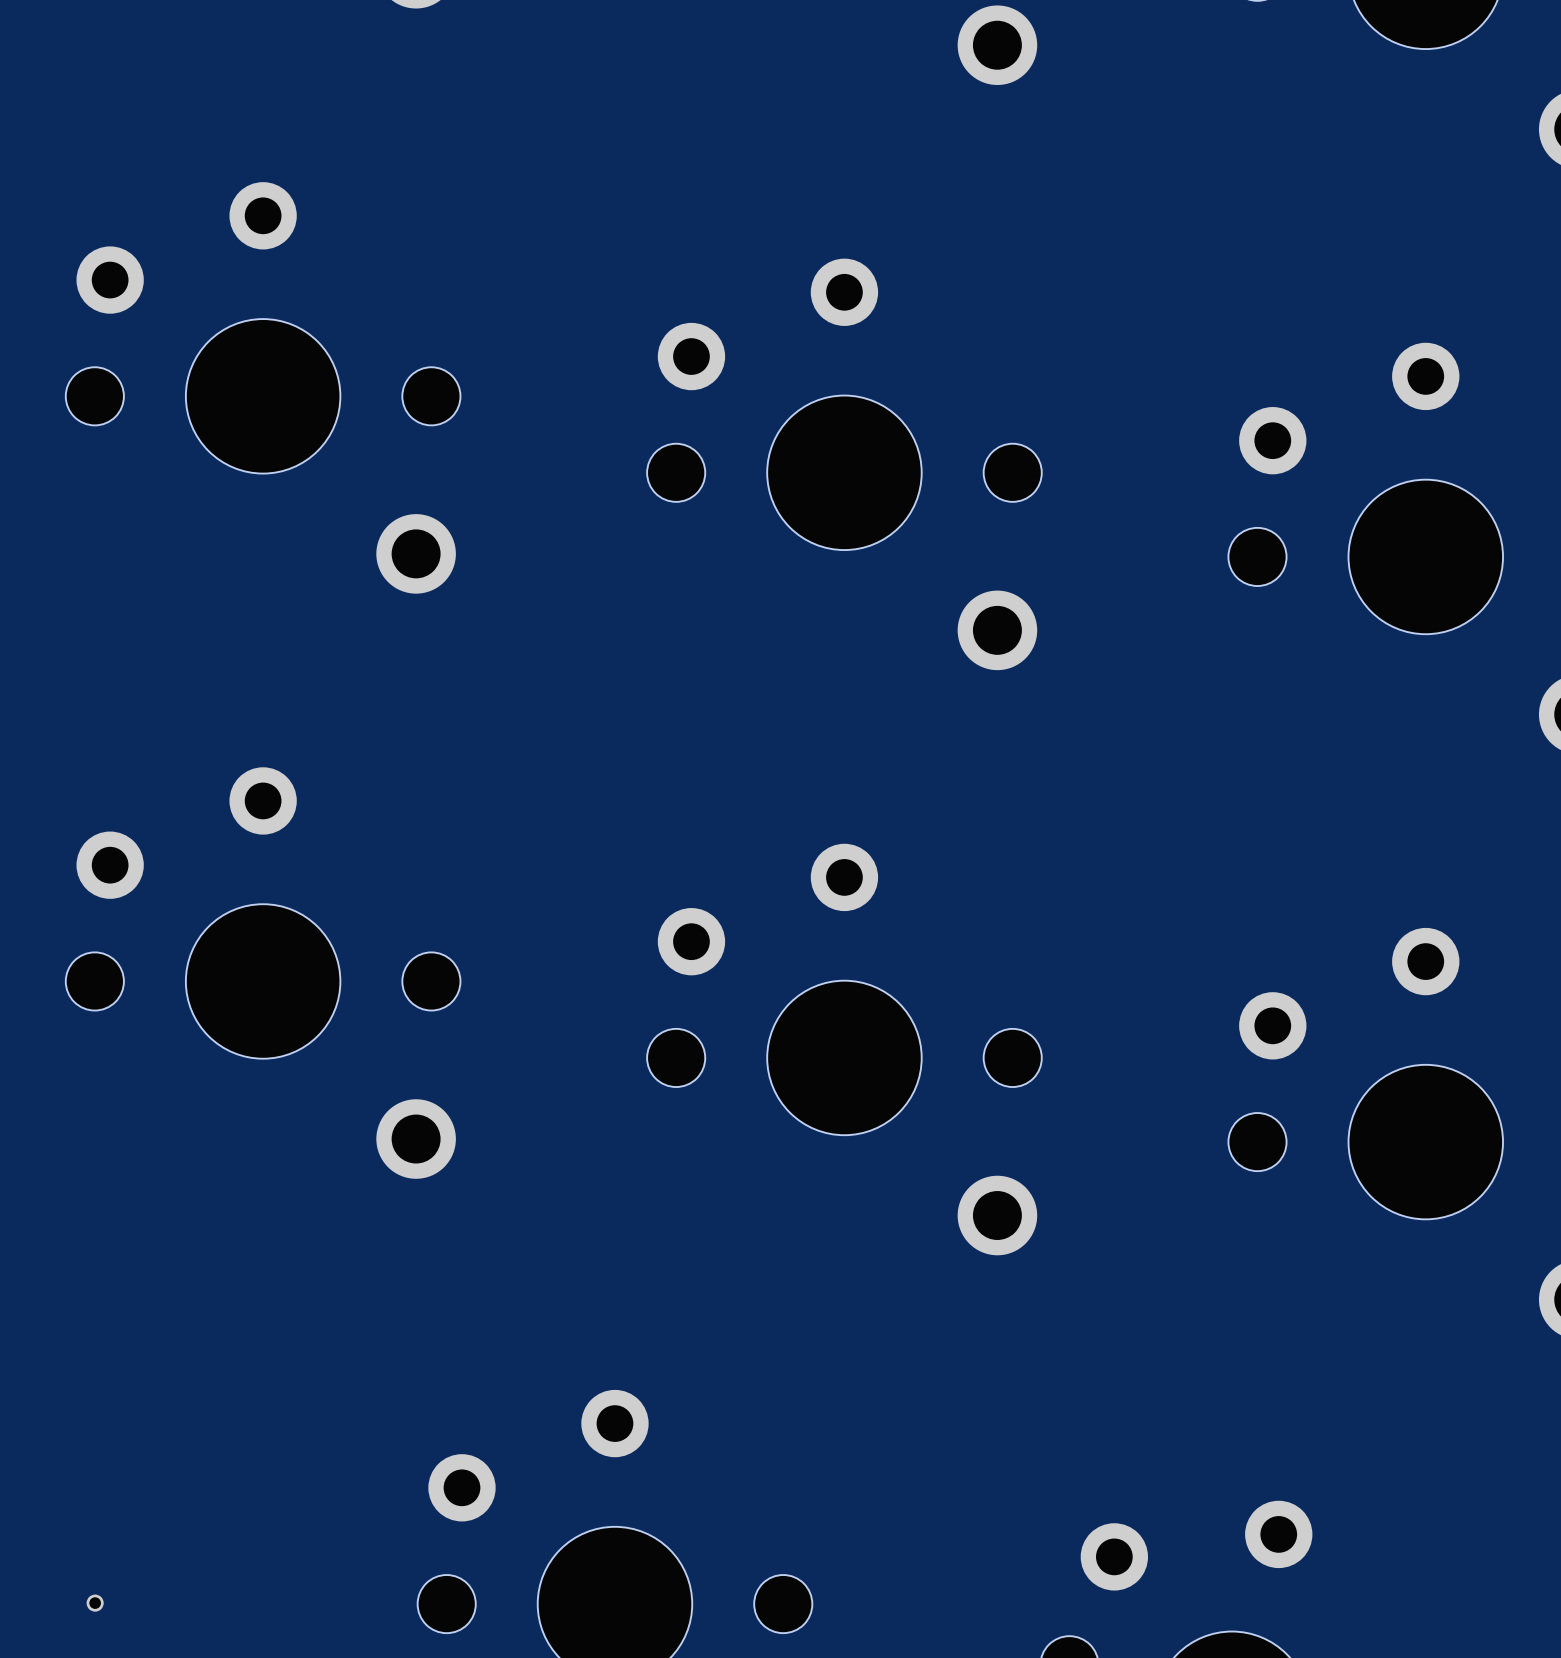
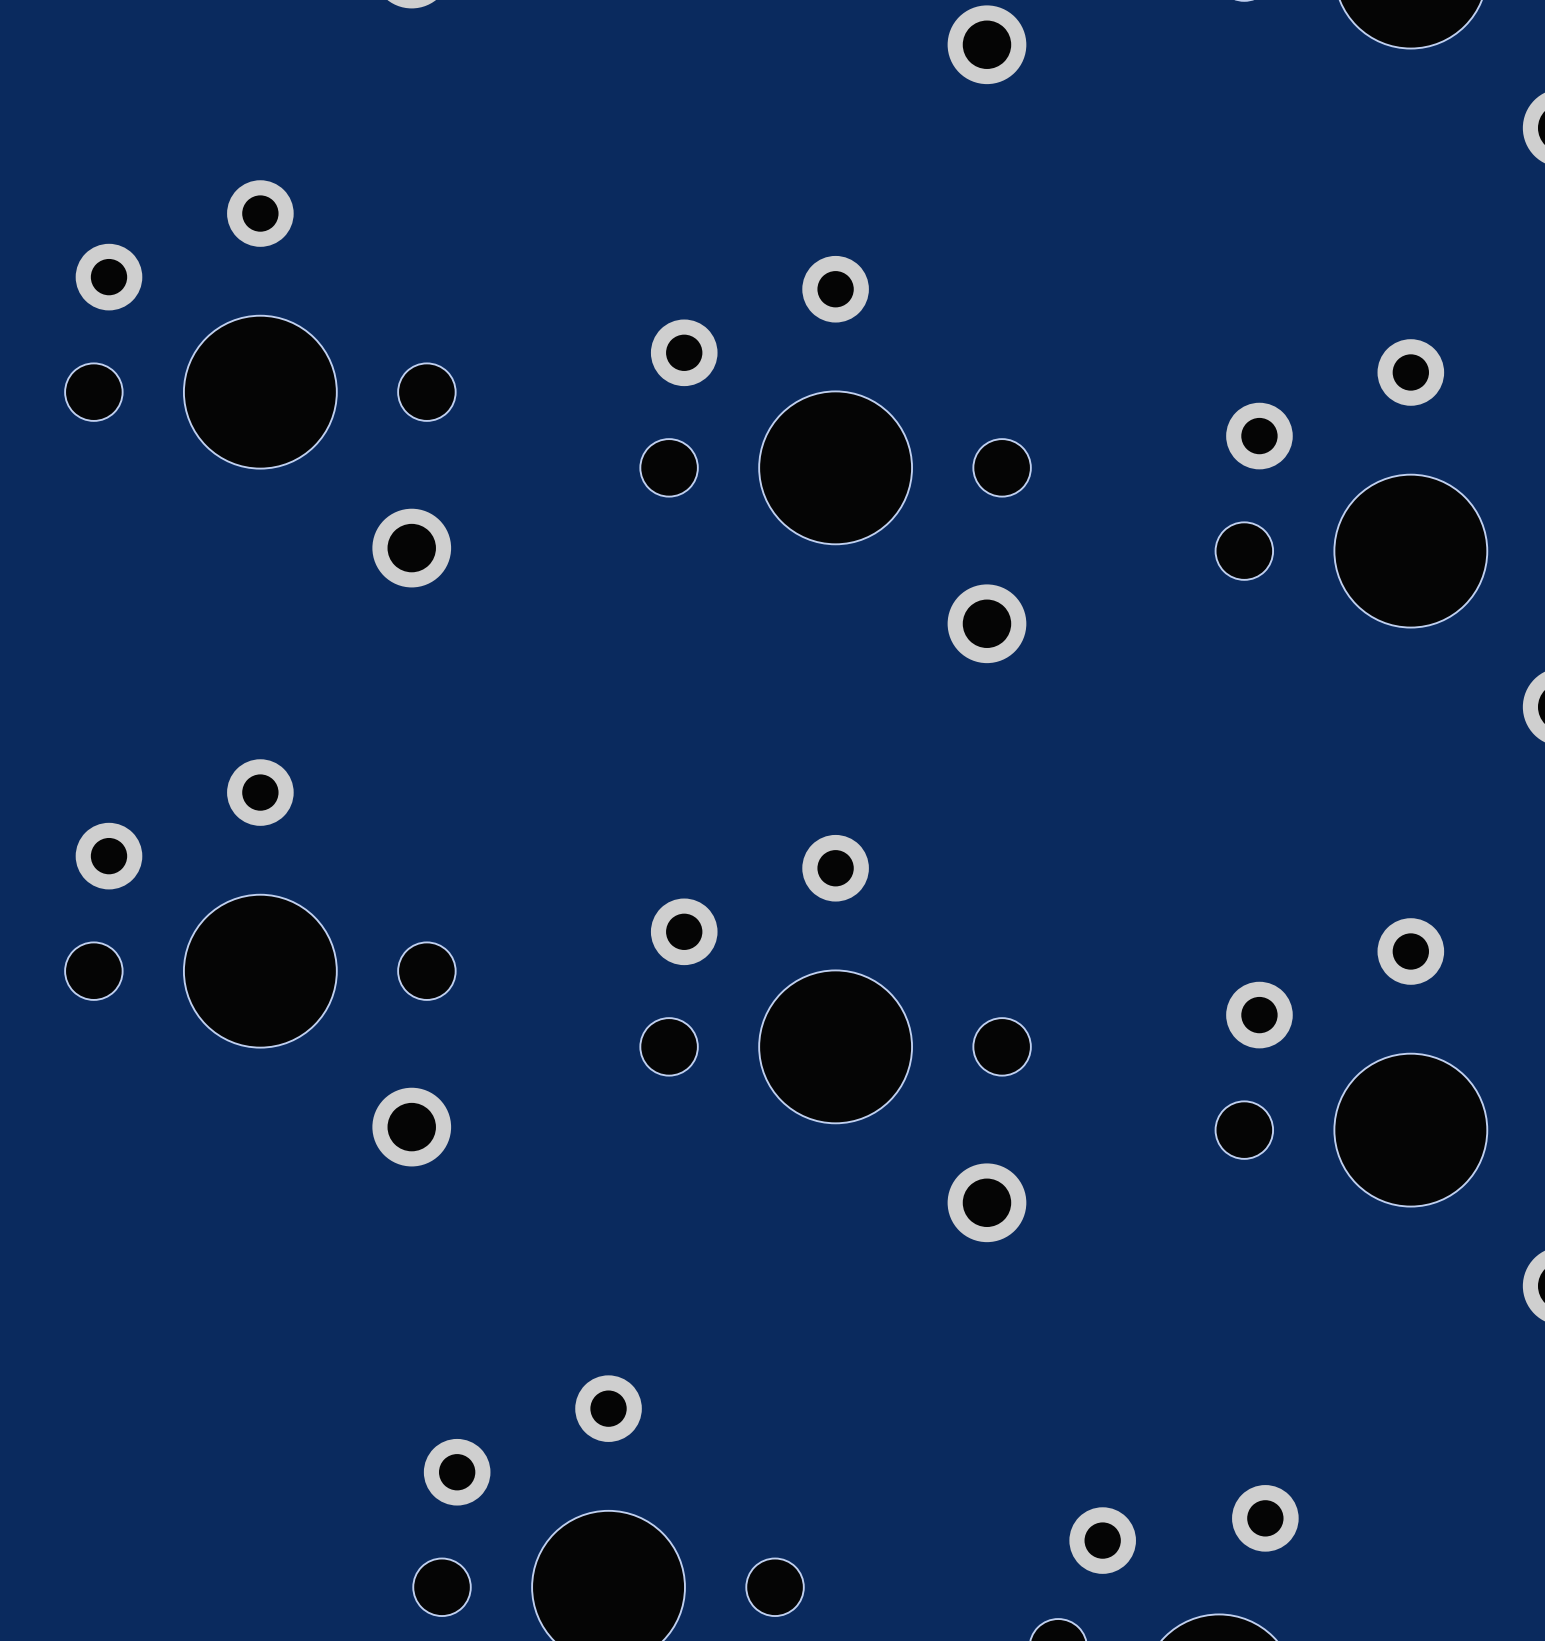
part: (95, 1603) -> none

